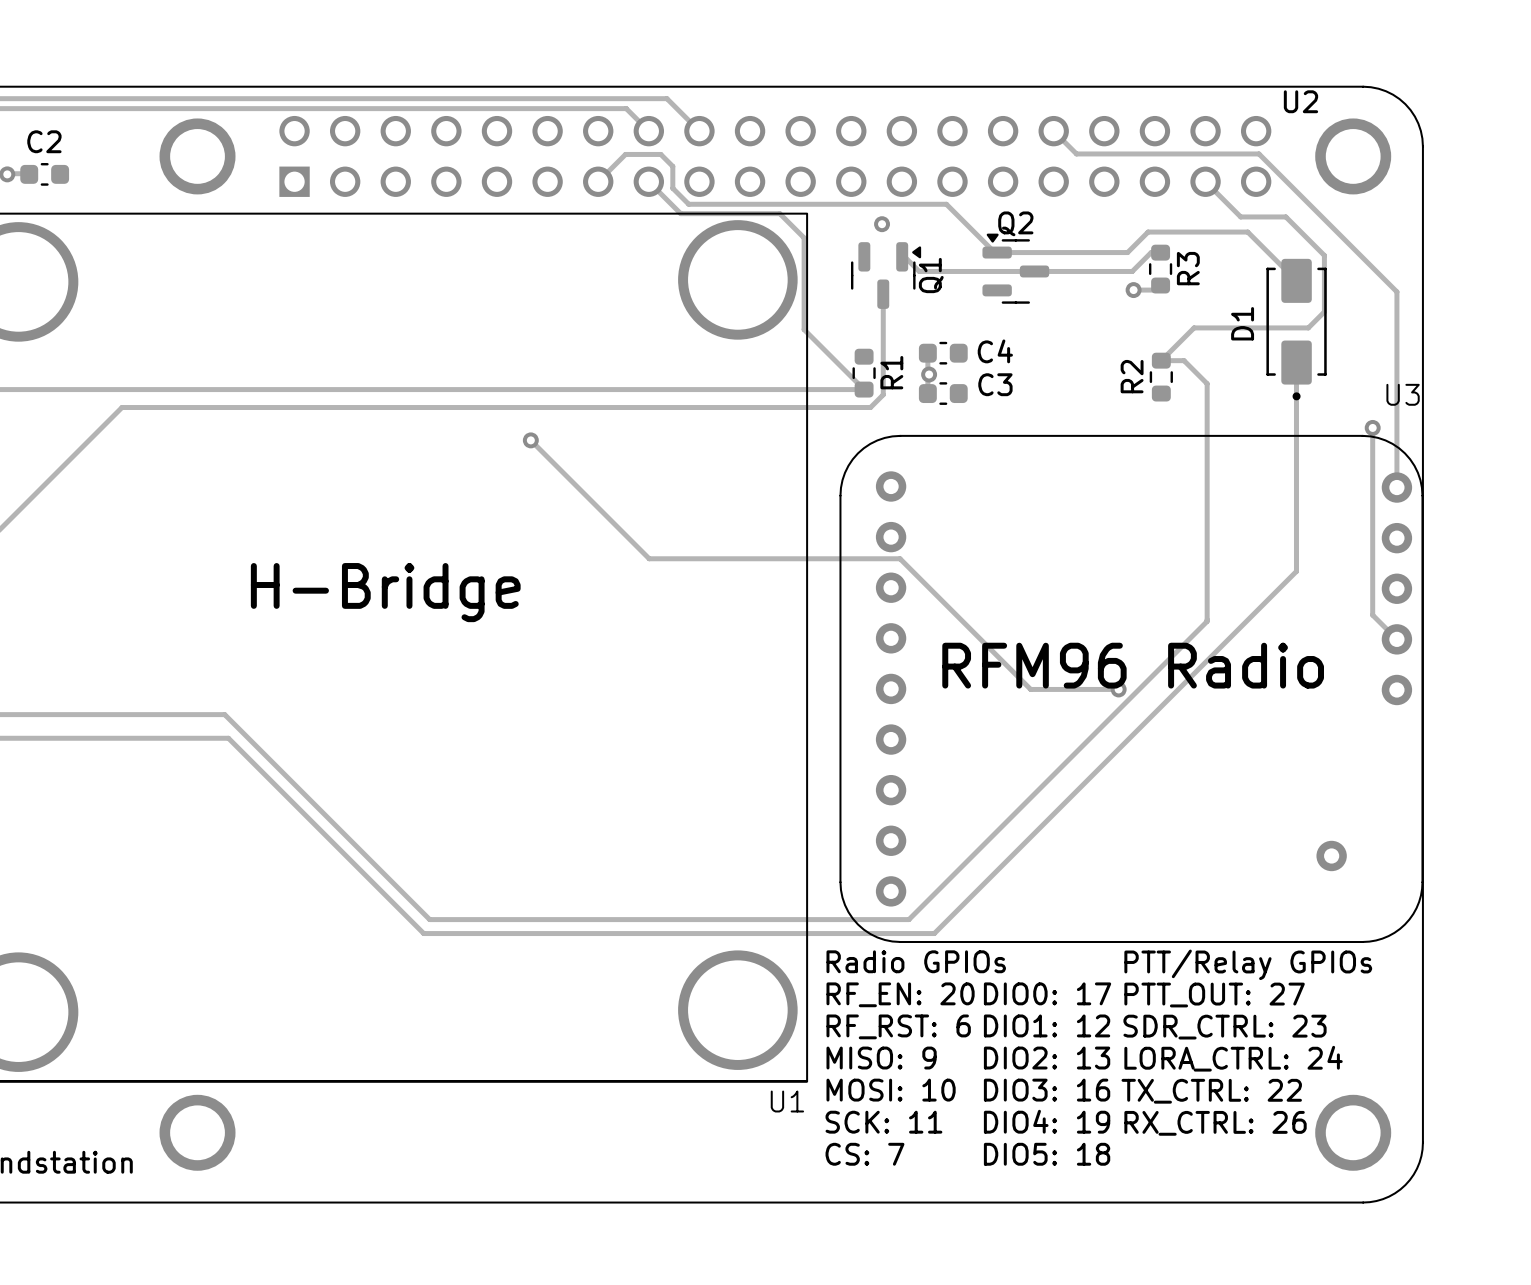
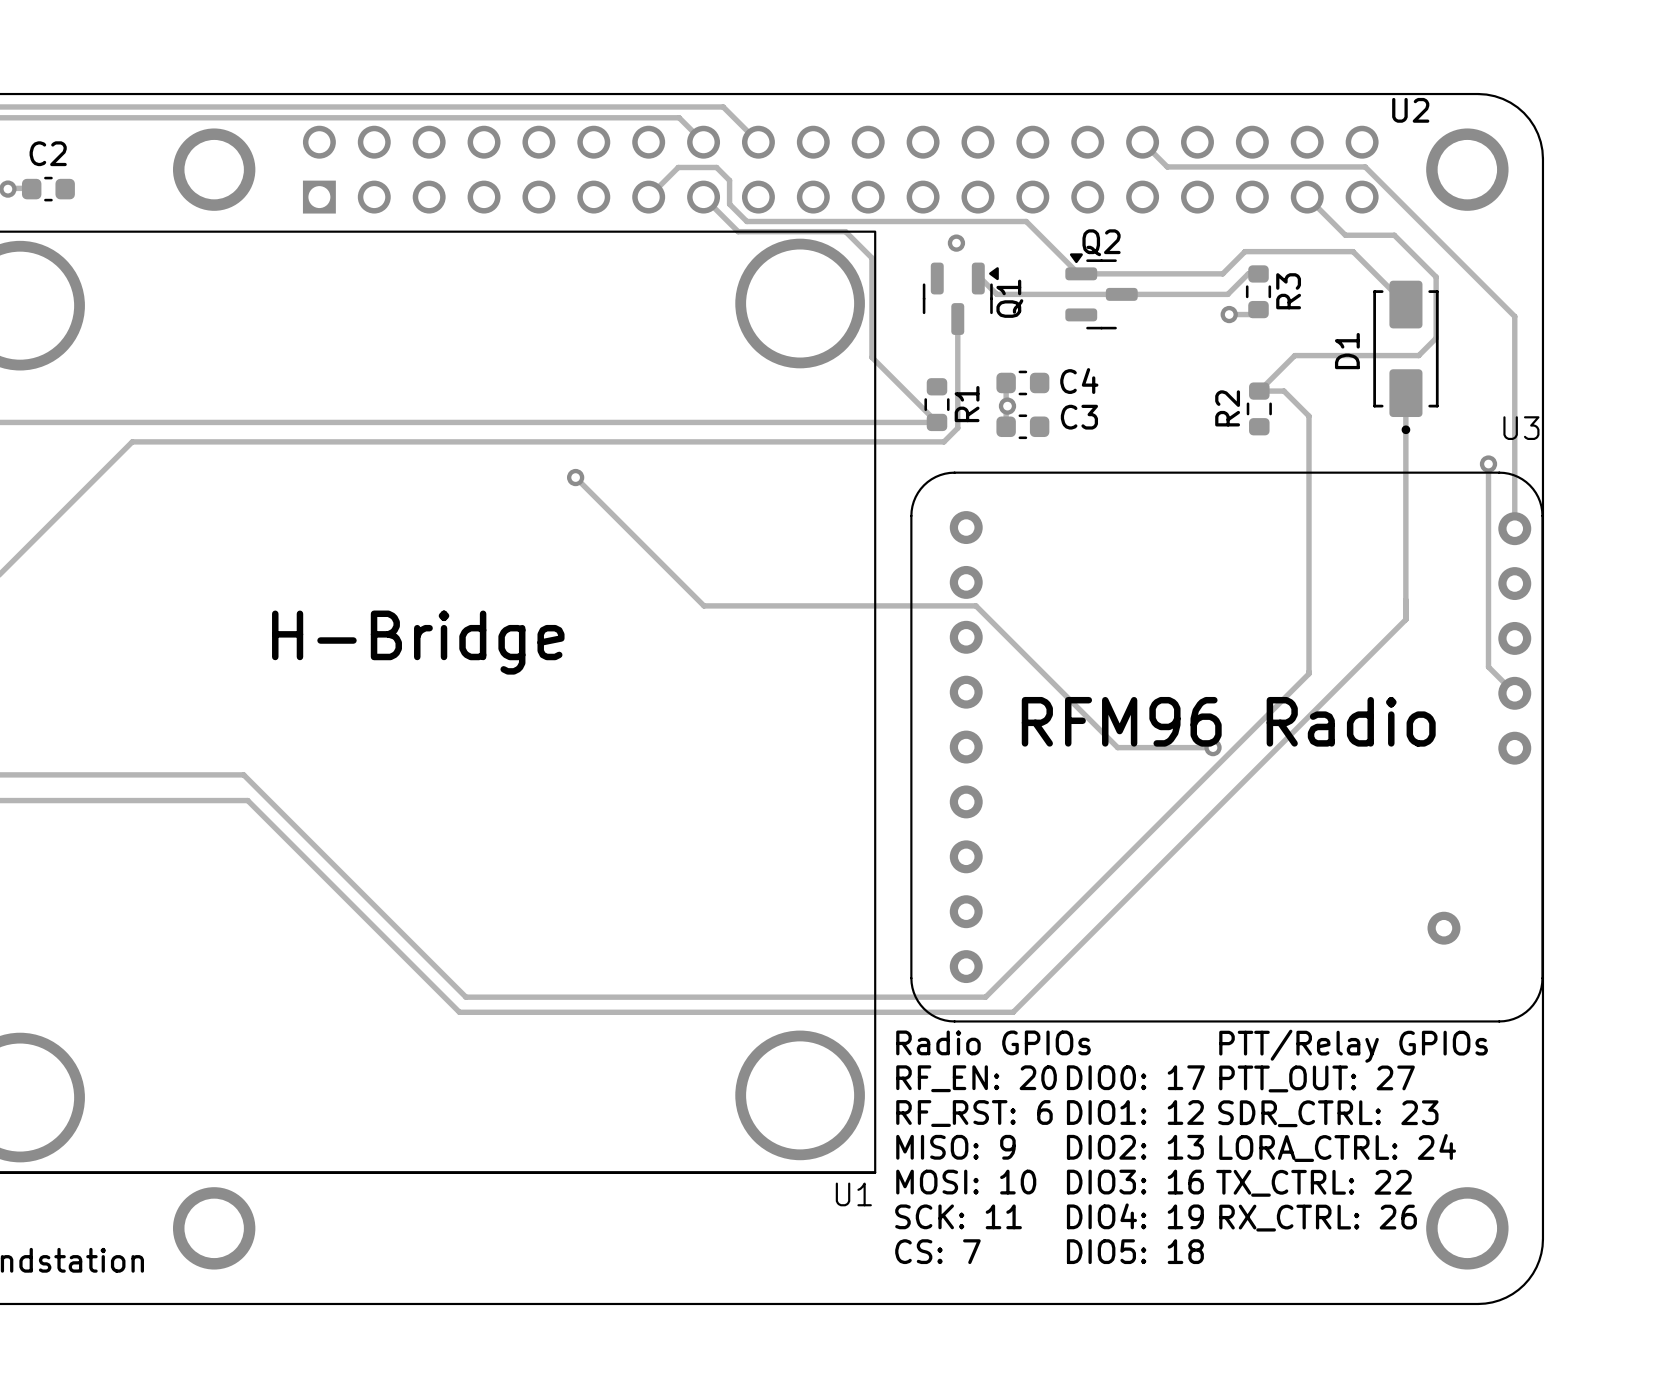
U3 footprint: [839, 434, 1424, 943] -> [910, 471, 1544, 1023]

